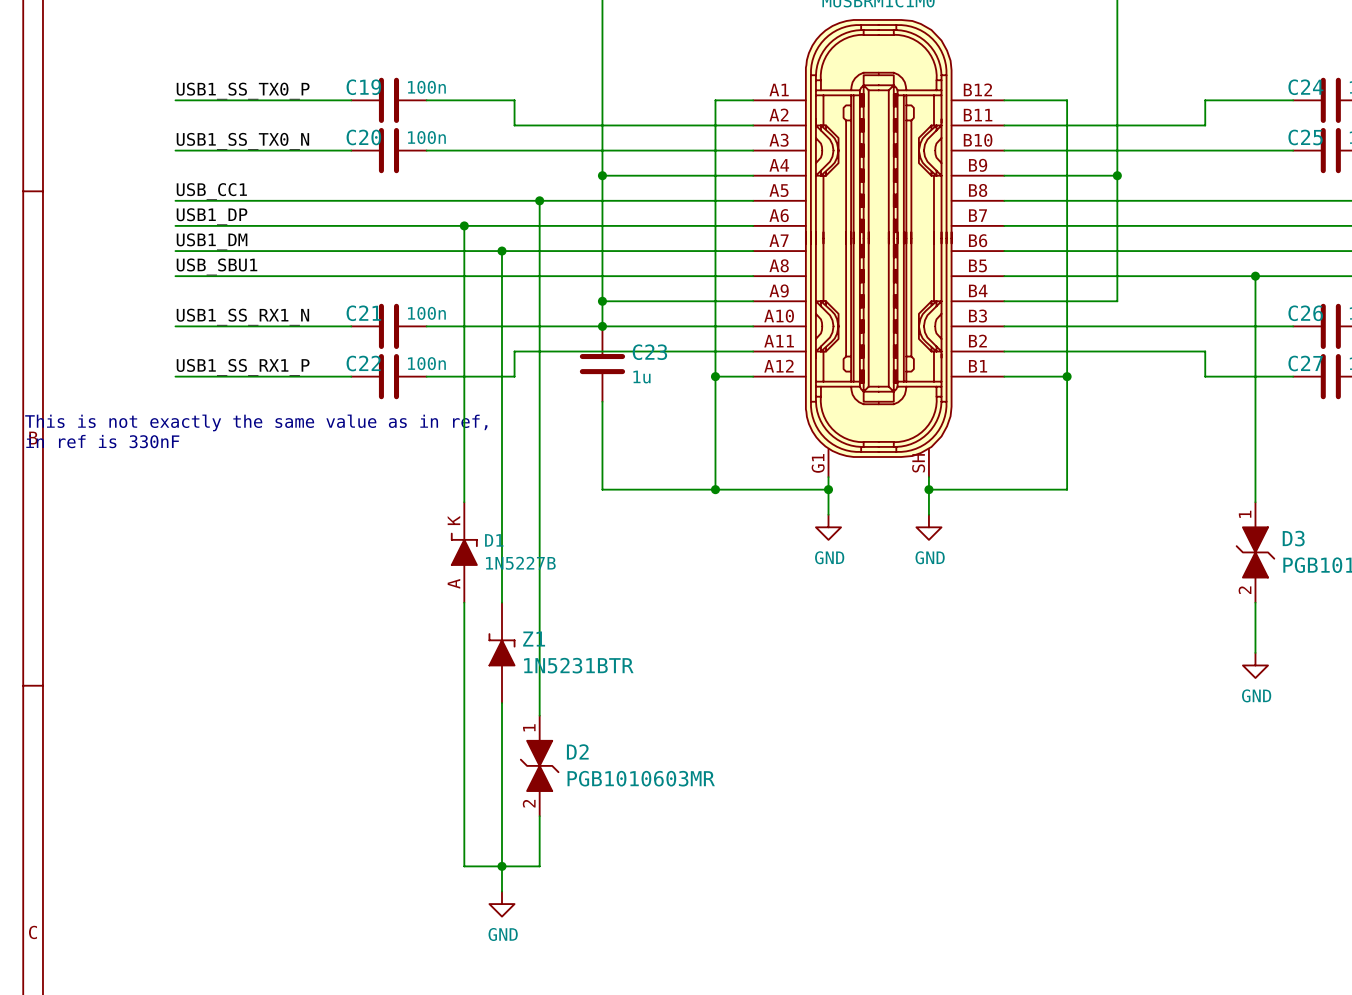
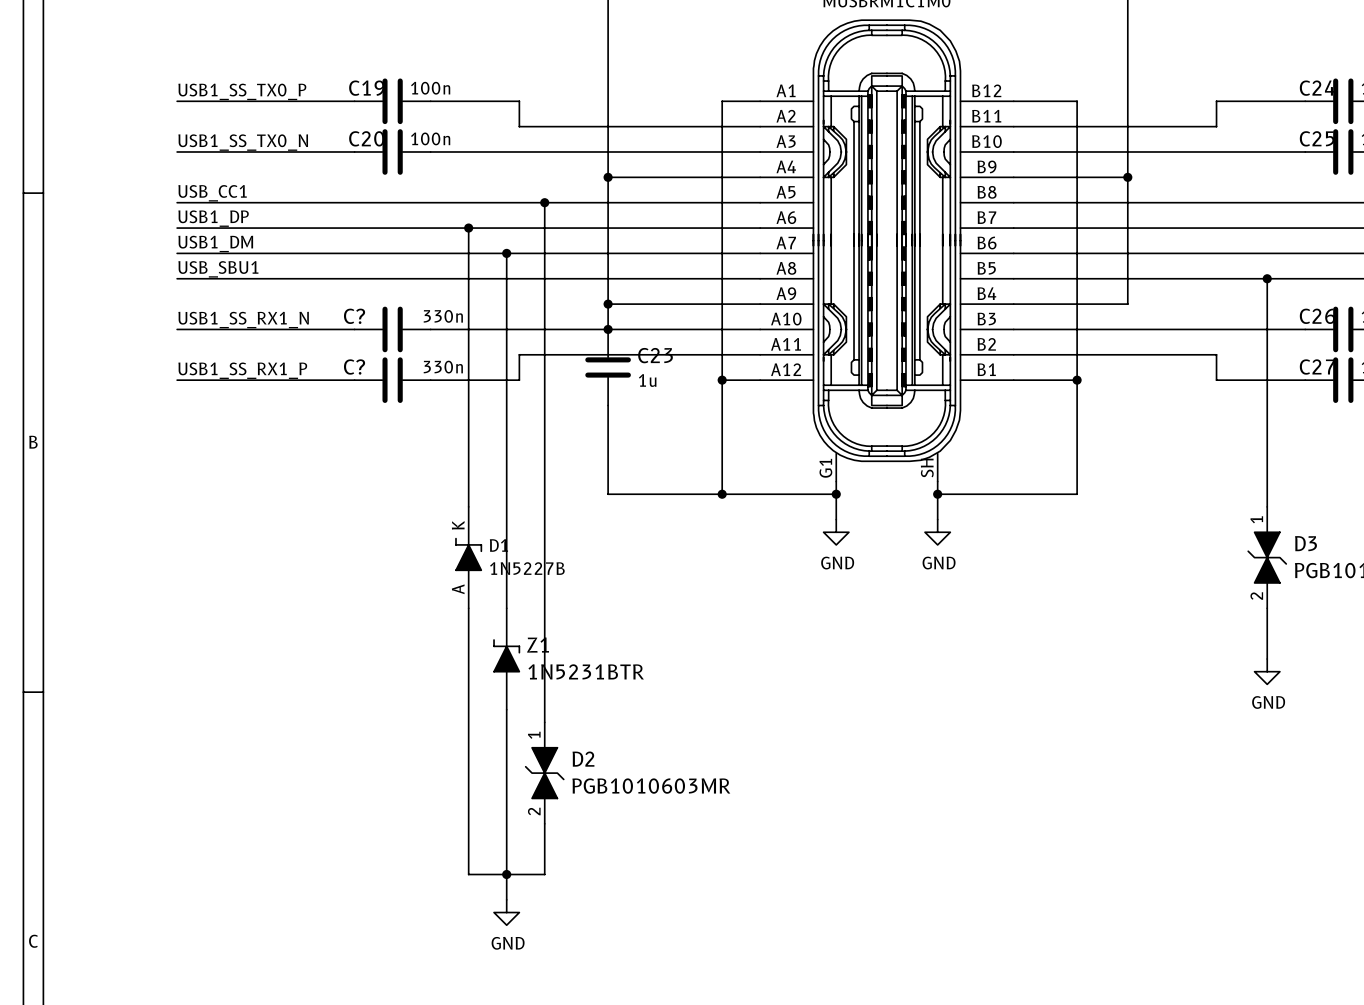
C21 name: C21 (363, 313) -> C? (354, 316)
C21 text: 100n (426, 313) -> 330n (443, 316)
C22 name: C22 (363, 363) -> C? (354, 367)
C22 text: 100n (426, 363) -> 330n (443, 367)
text: This is not exactly the same value as in ref, (256, 422) -> none
text: in ref is 330nF (102, 441) -> none

